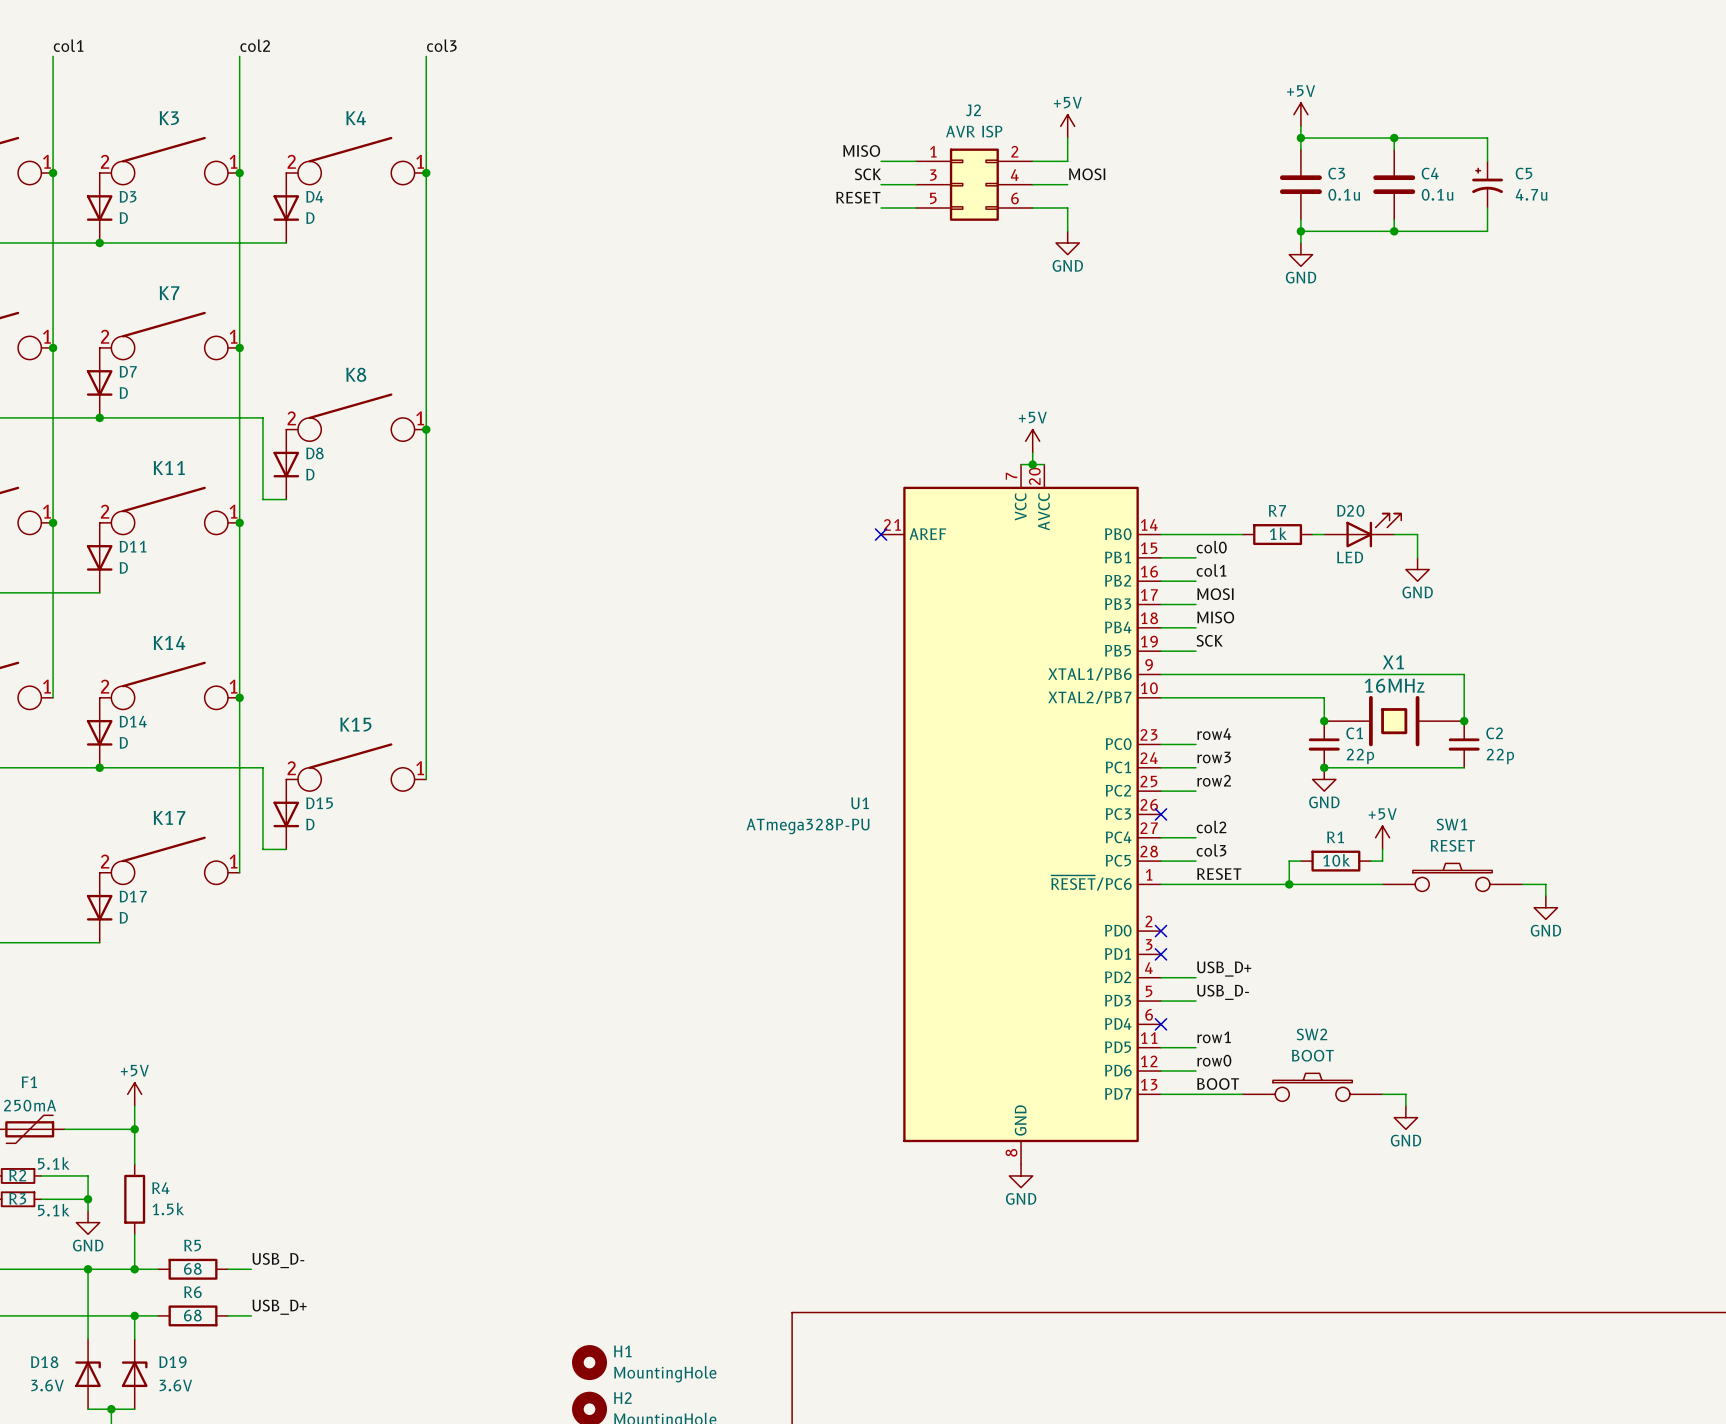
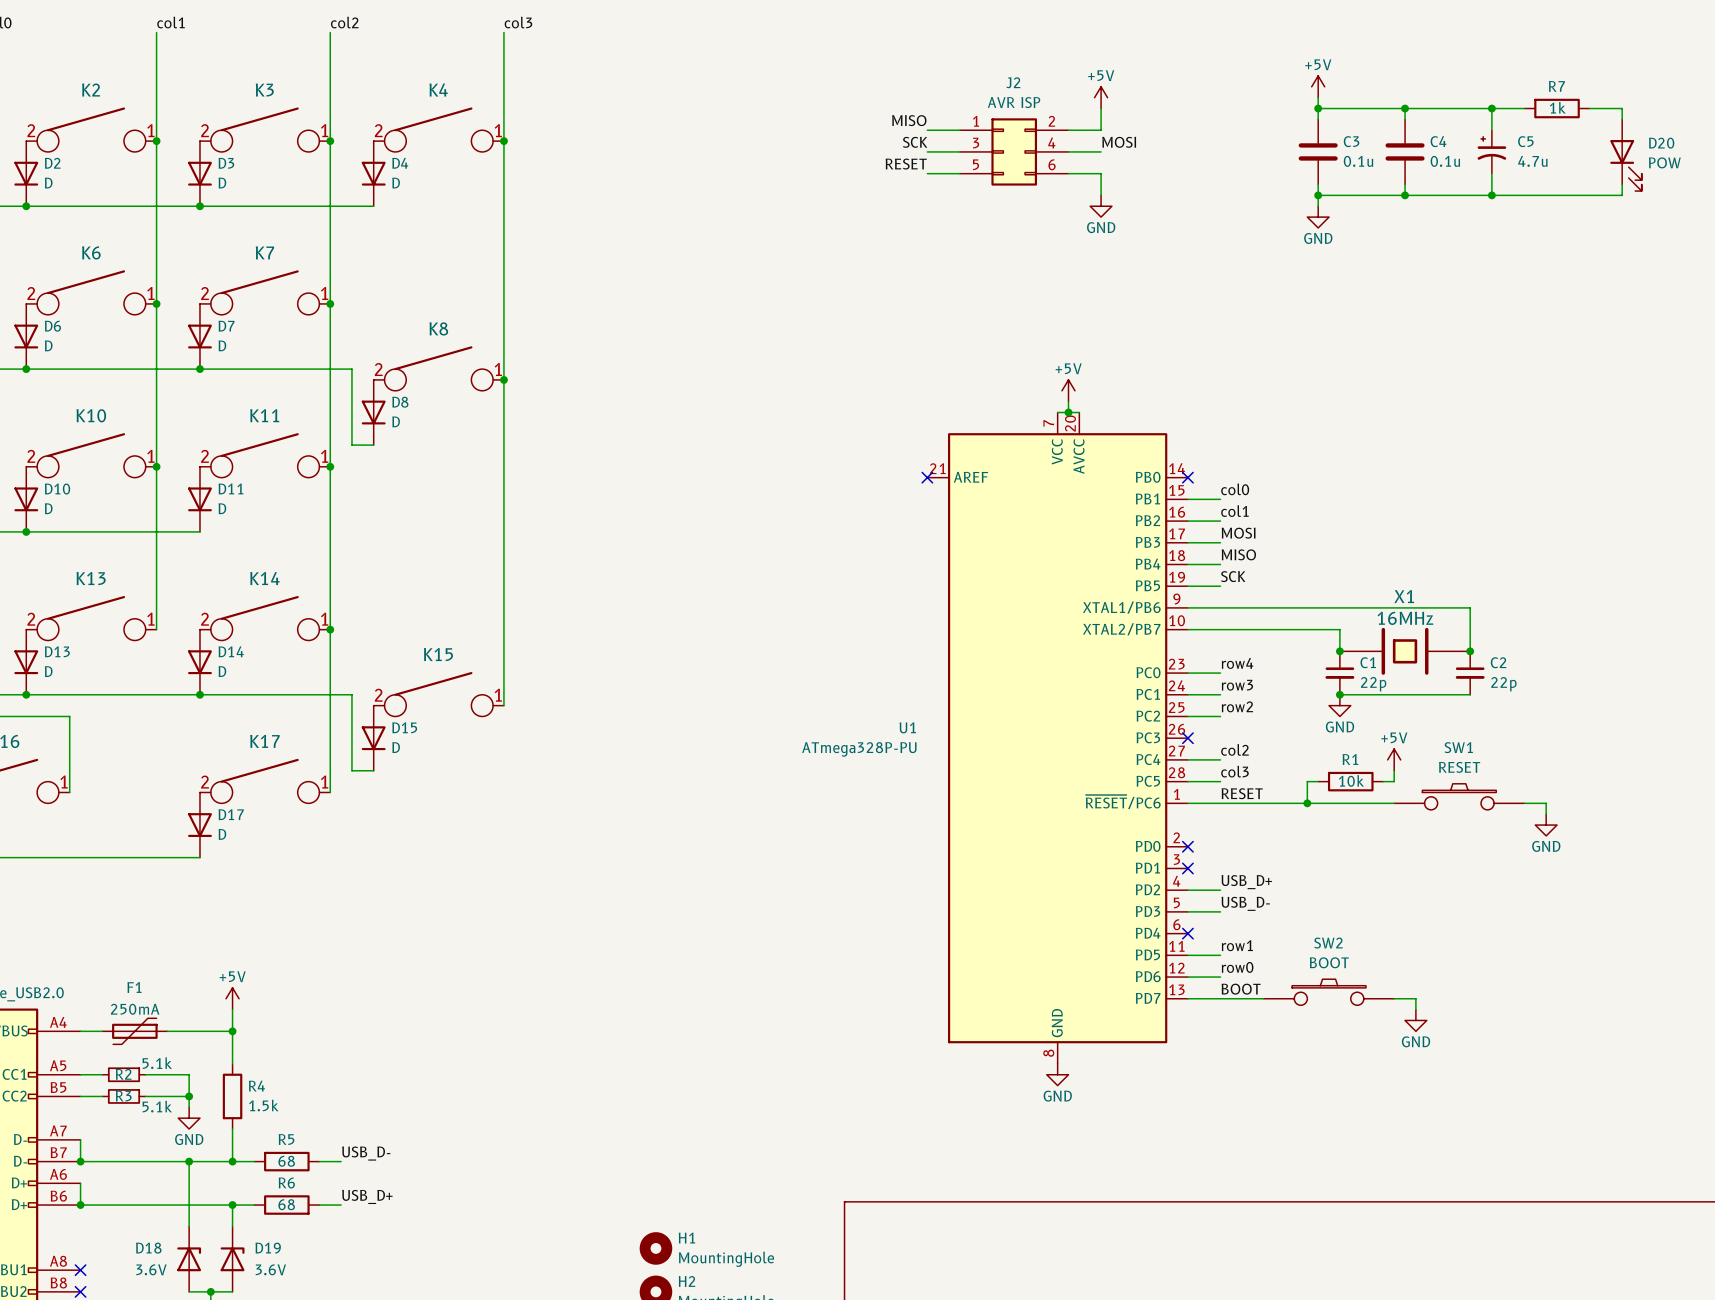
wire: none -> (1491, 108) (1524, 108)
junction: none -> (1491, 108)
wire: none -> (1589, 108) (1622, 108) (1622, 119)
wire: none -> (1622, 184) (1622, 195) (1491, 195)
junction: none -> (1491, 195)
D20 name position: D20 (1350, 510) -> D20 (1661, 143)
D20 position: (1362, 530) -> (1625, 155)
D20 rotation: 0° (1373, 530) -> 90° clockwise (1625, 165)
wire: (1160, 534) (1242, 534) -> none
no-connect mark: none -> (1187, 477)
R7 position: (1277, 534) -> (1557, 108)
wire: (1312, 534) (1324, 534) -> none
wire: (1394, 534) (1417, 534) (1417, 557) -> none
D20 value: LED (1350, 557) -> POW (1664, 162)
power symbol: GND (1417, 569) -> none

